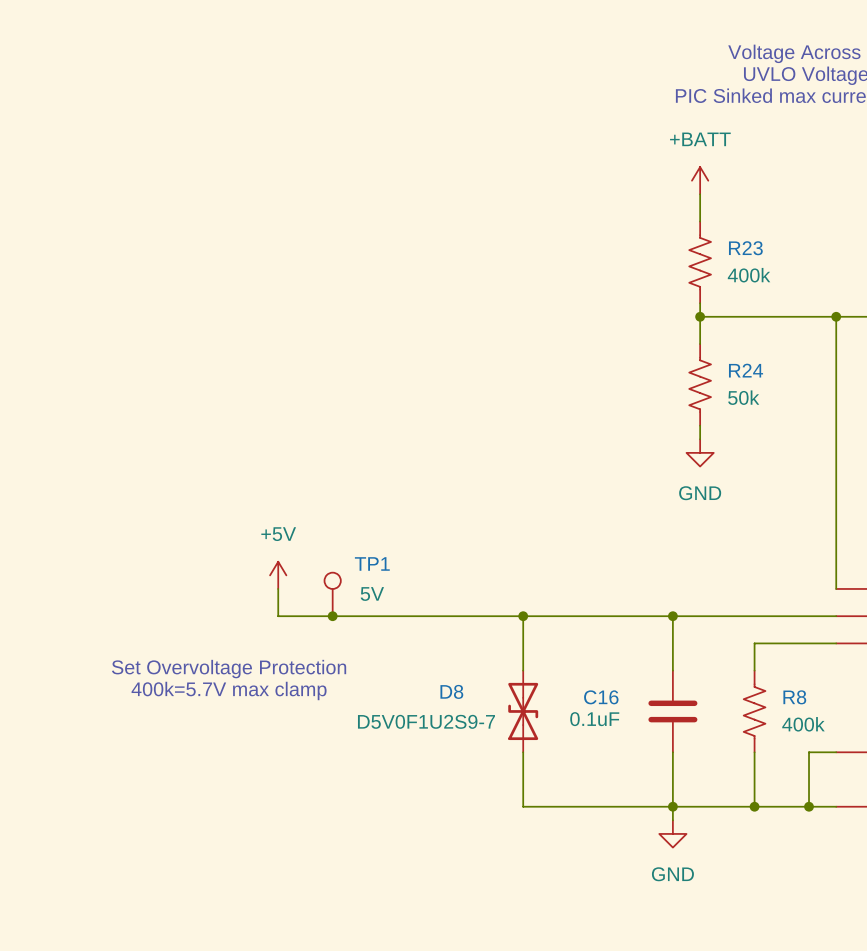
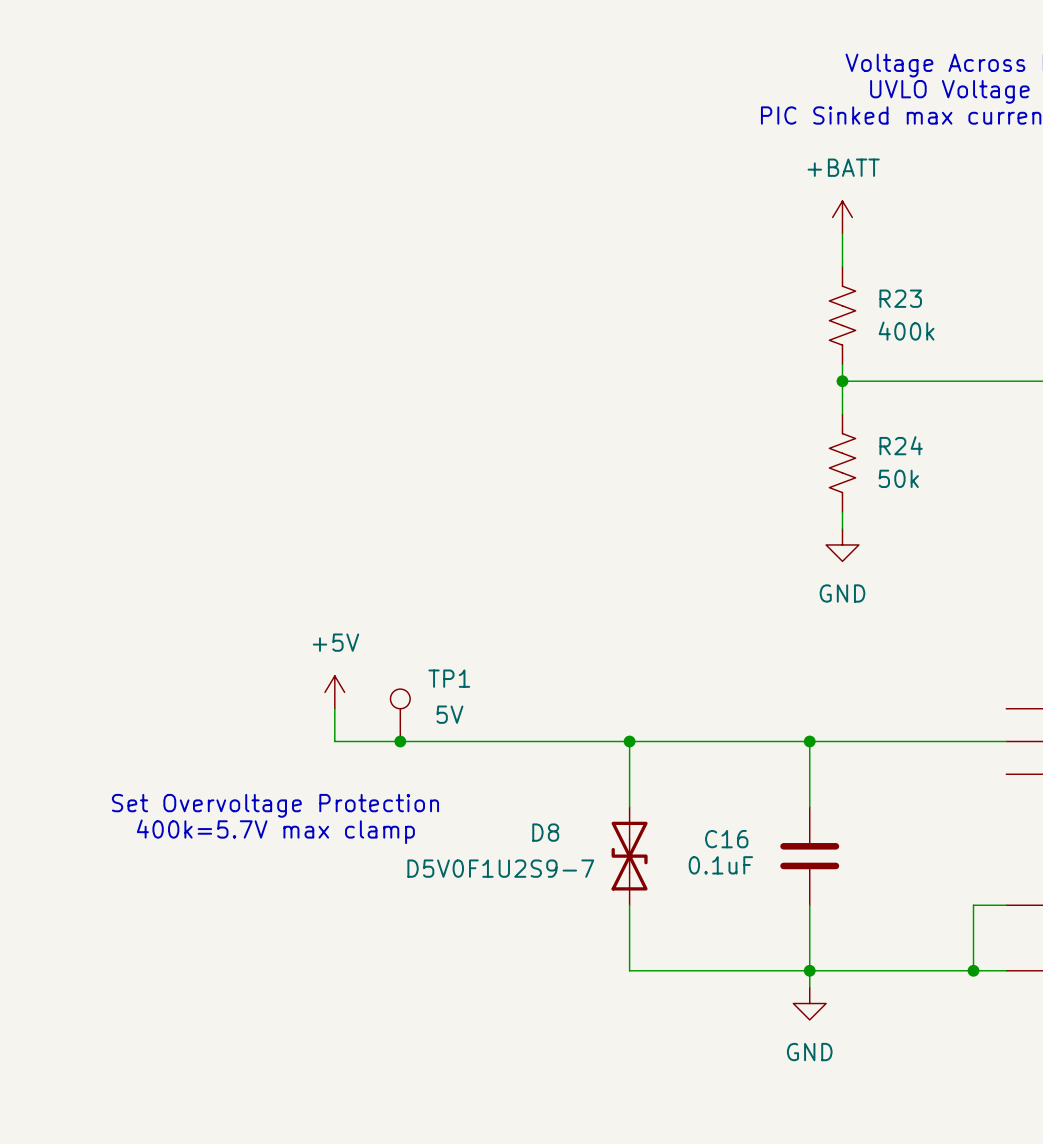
wire: (836, 316) (836, 588) -> none
junction: (836, 316) -> none
wire: (836, 643) (754, 643) (754, 670) -> none
R8: 400k (754, 711) -> none
wire: (754, 752) (754, 806) -> none
junction: (754, 806) -> none

